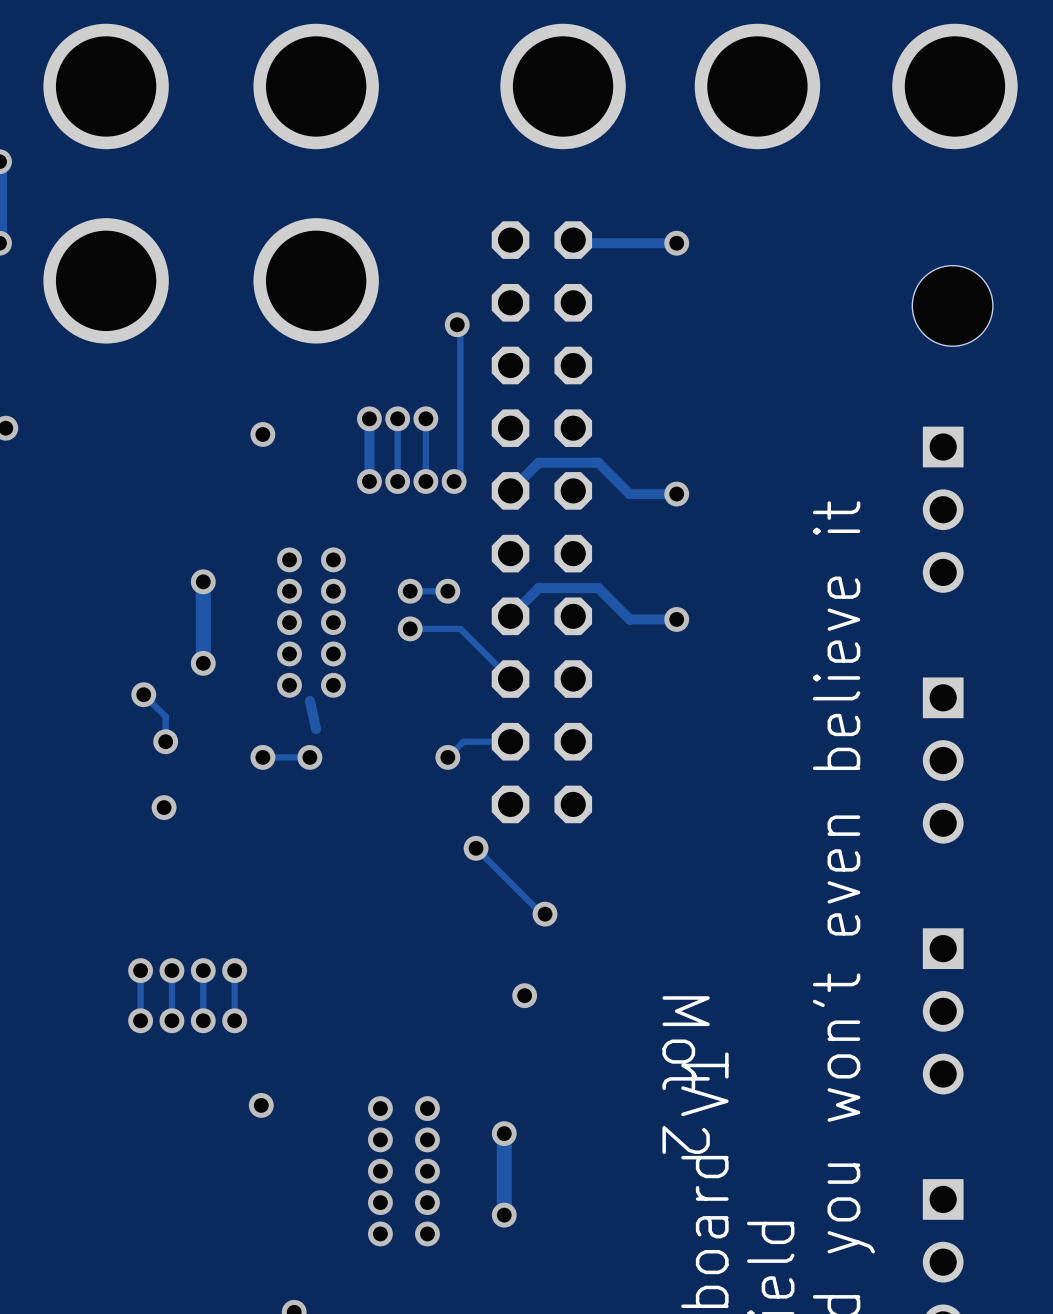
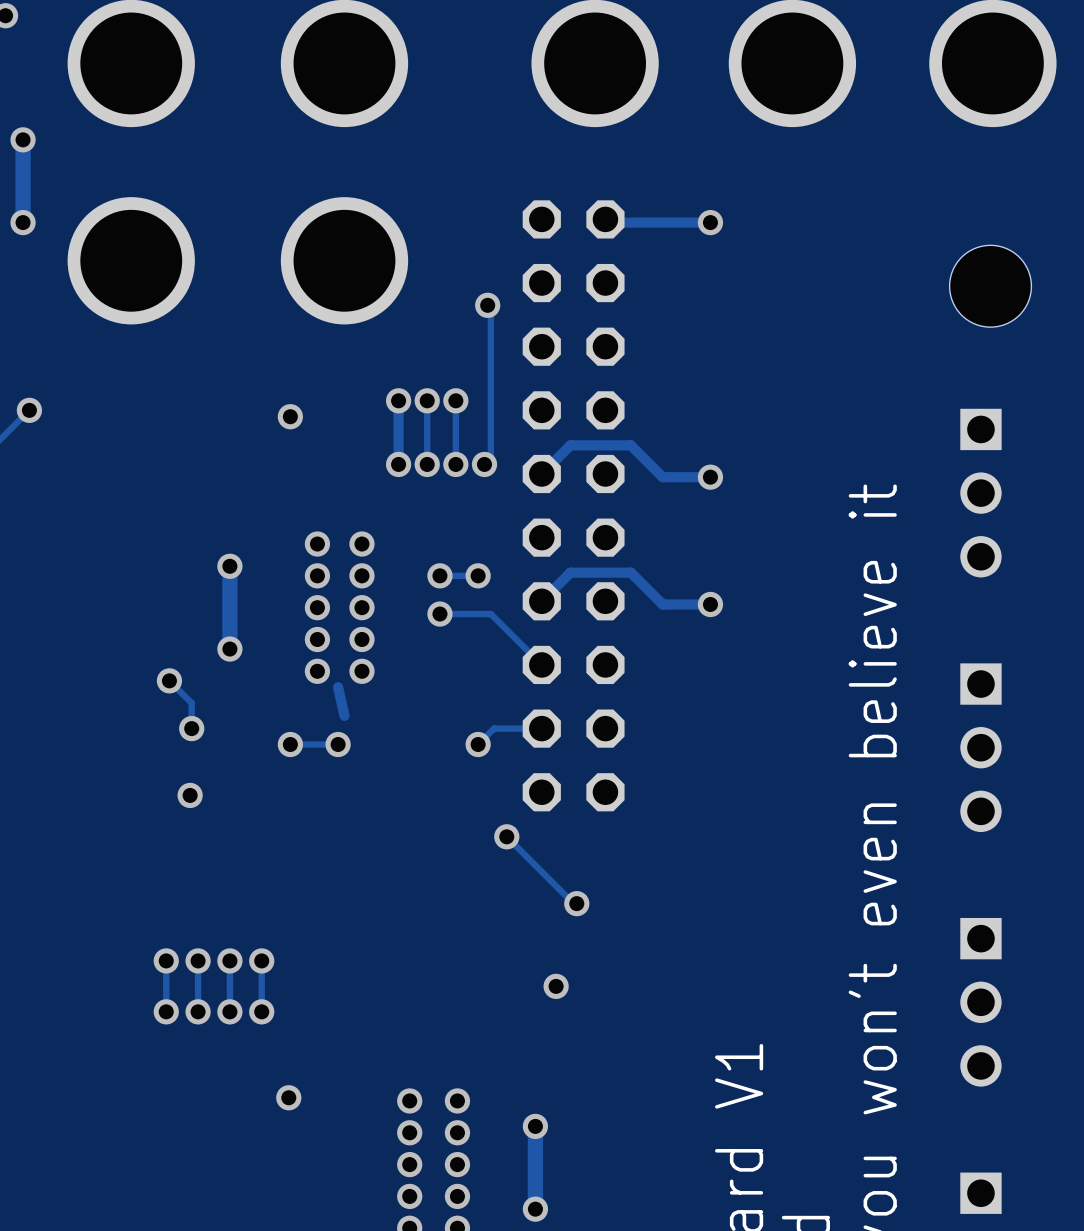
text: Mot 2 (686, 1075) -> none

